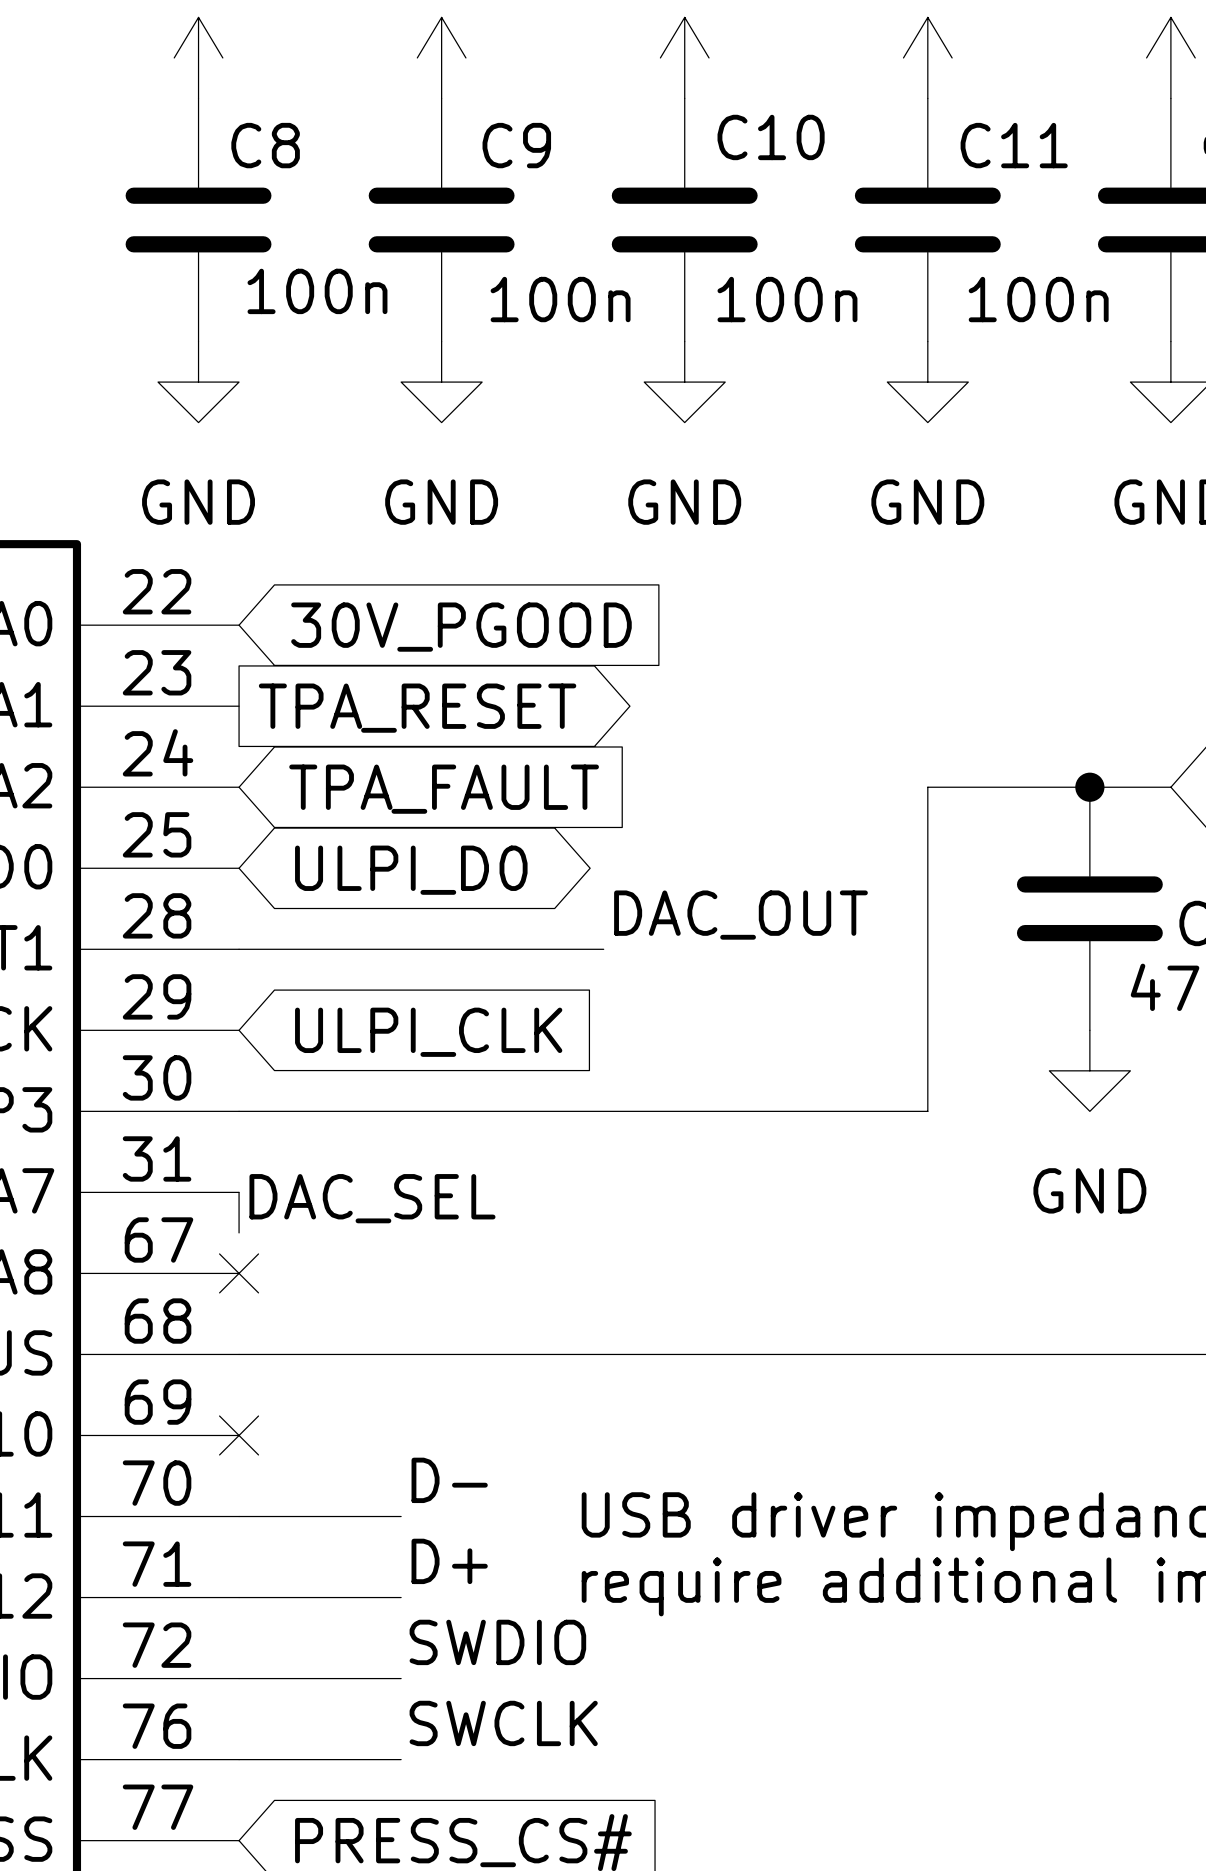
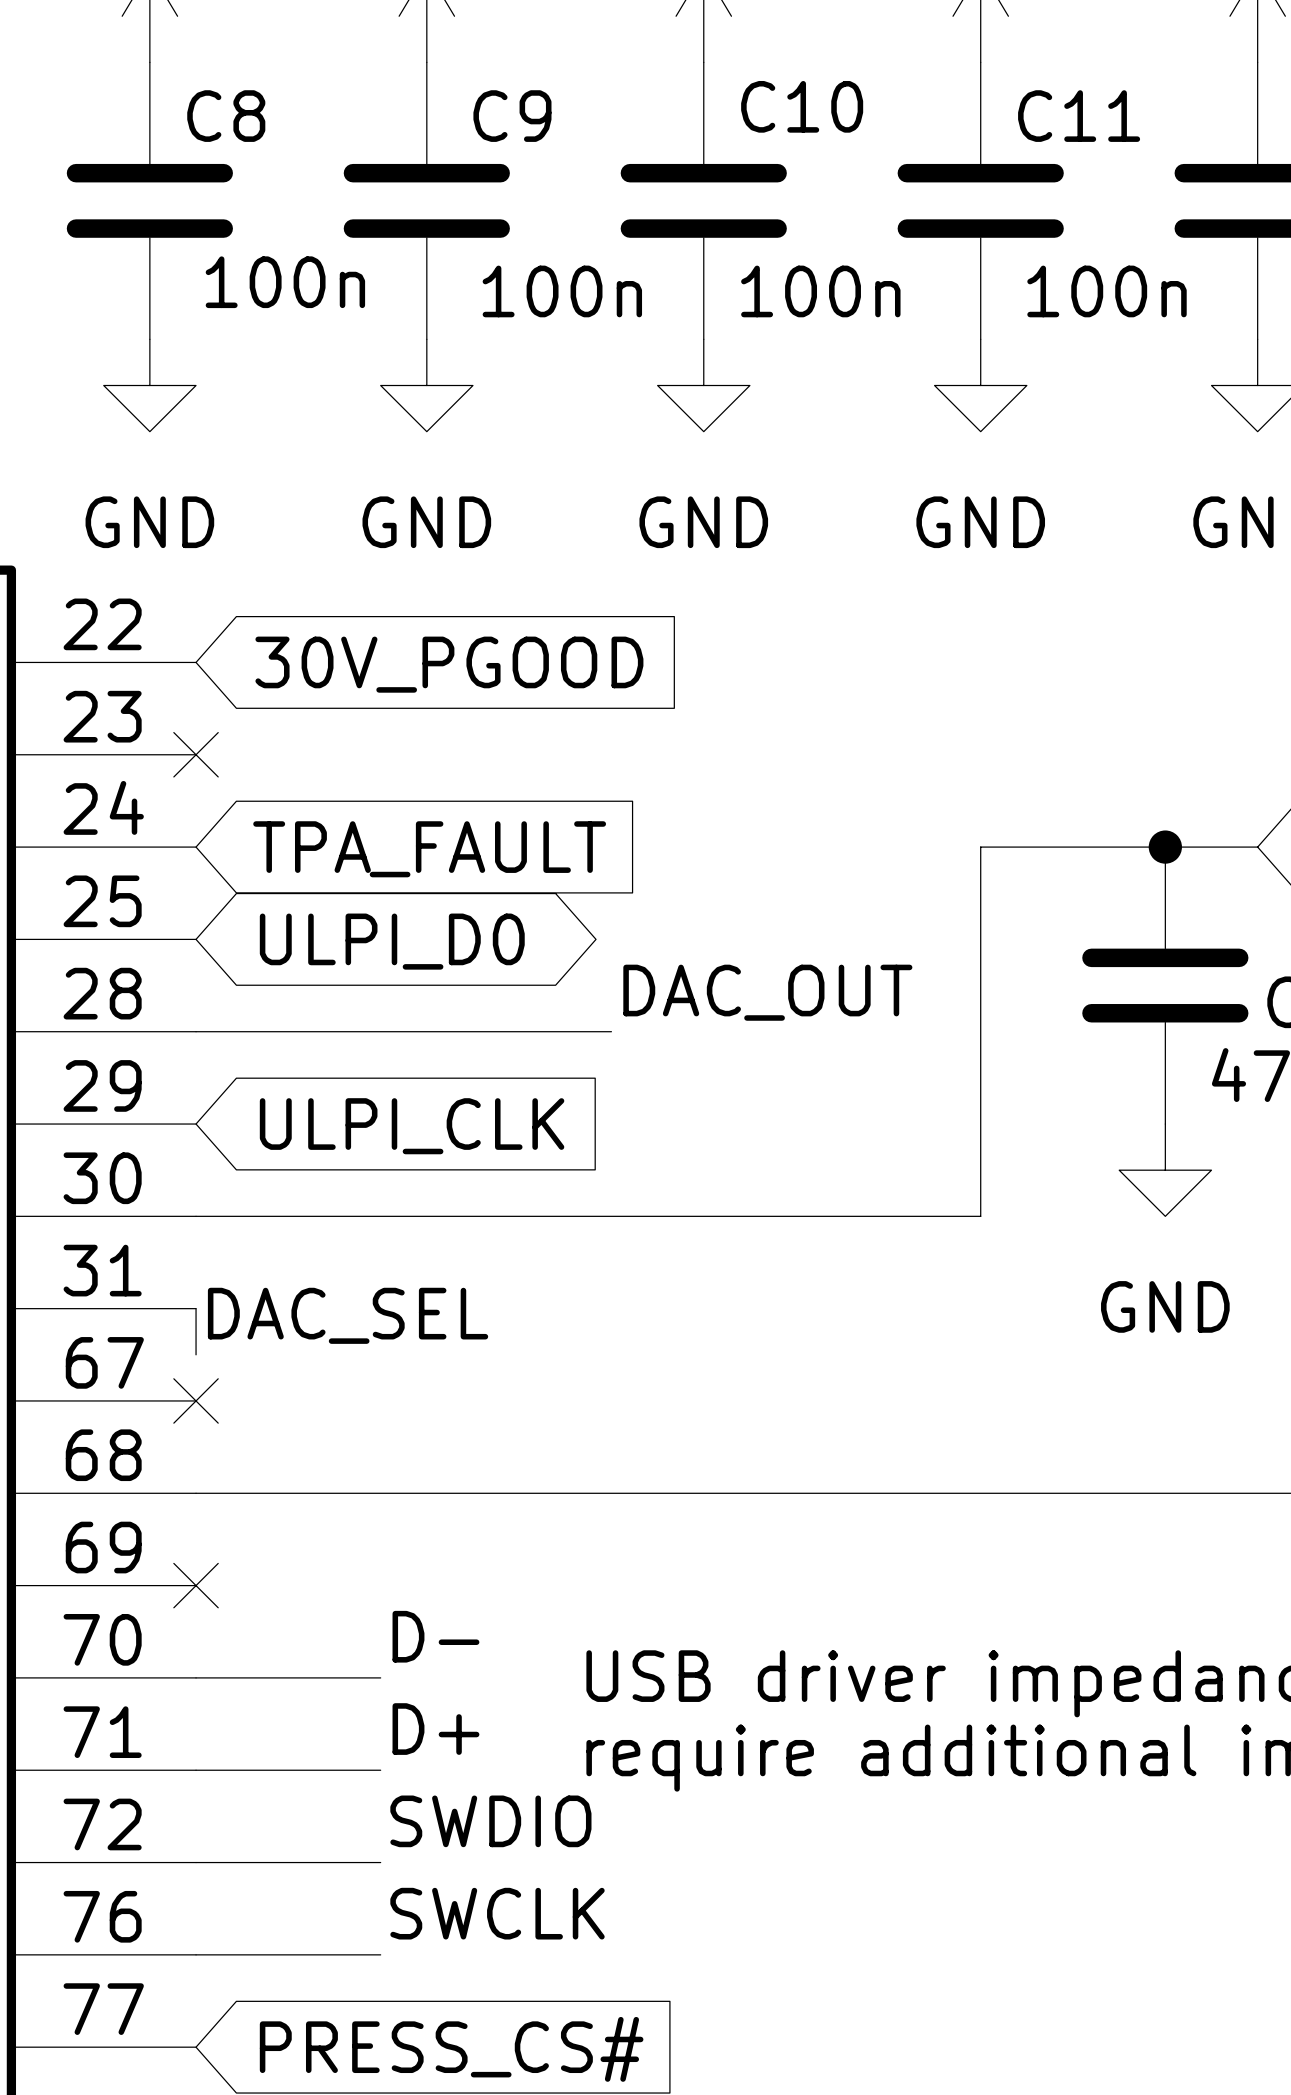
no-connect mark: none -> (196, 754)
global label: TPA_RESET (417, 708) -> none

